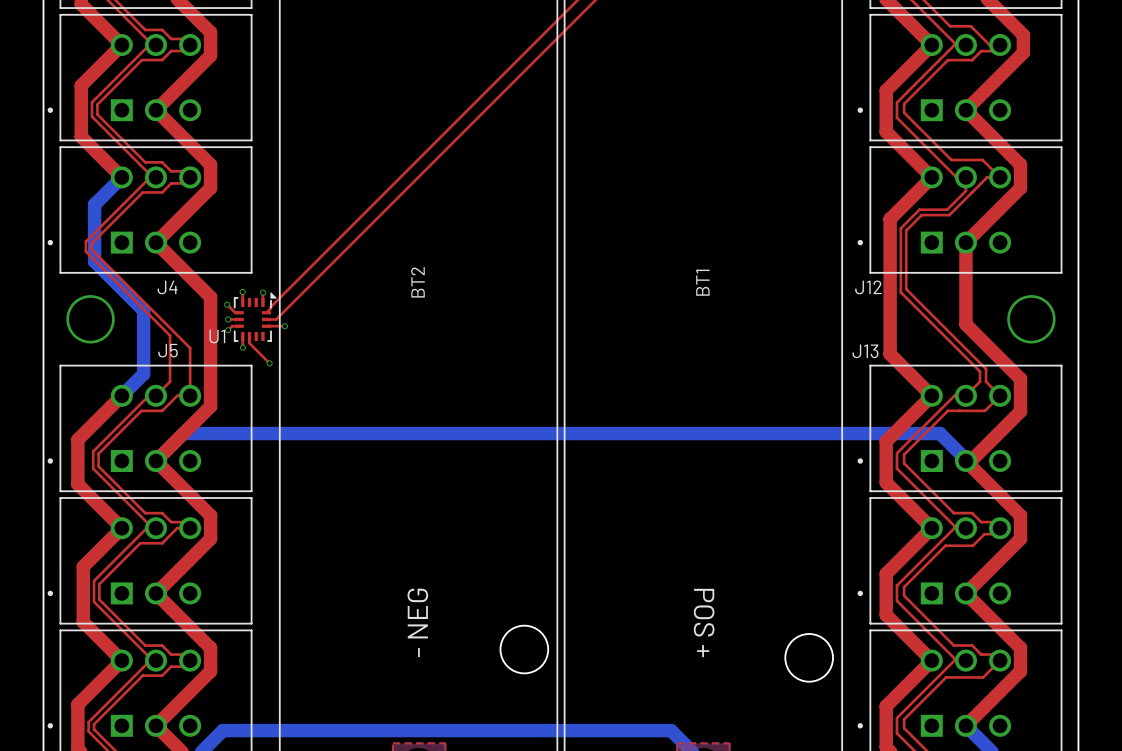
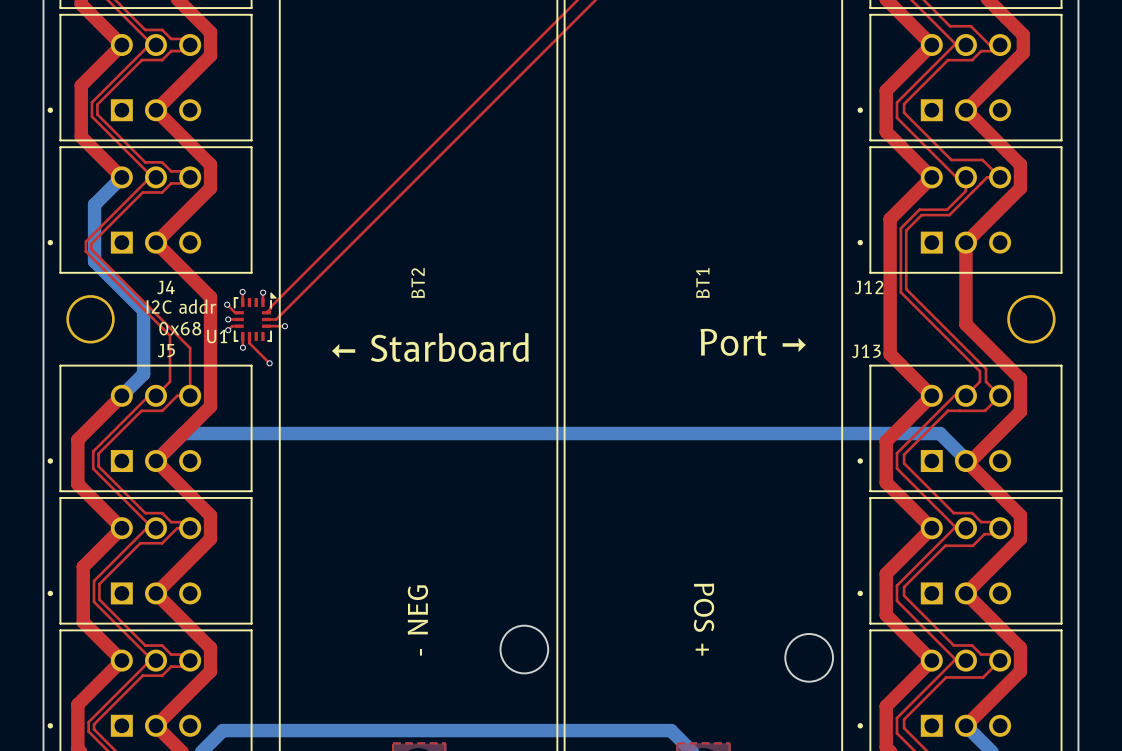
text: none -> I2C addr (181, 306)
text: none -> 0x68 (180, 328)
text: none -> Port → (753, 342)
text: none -> ← Starboard (430, 347)

